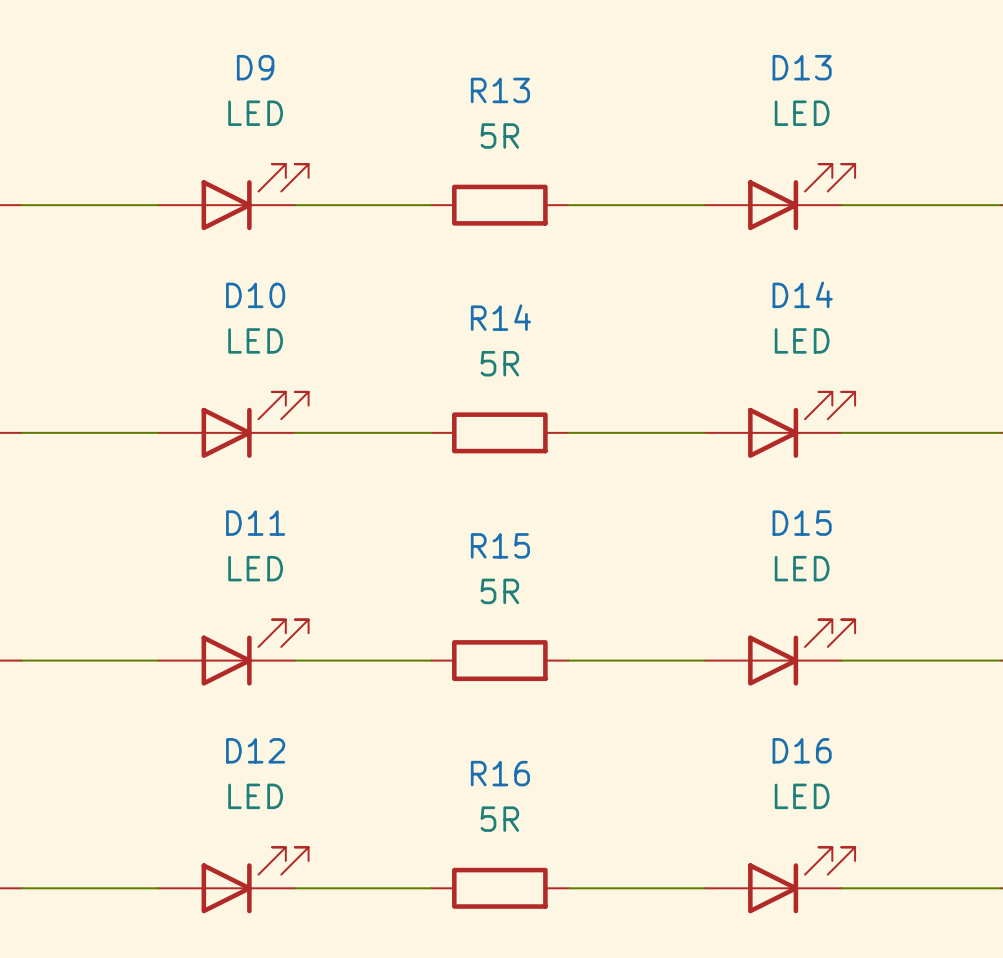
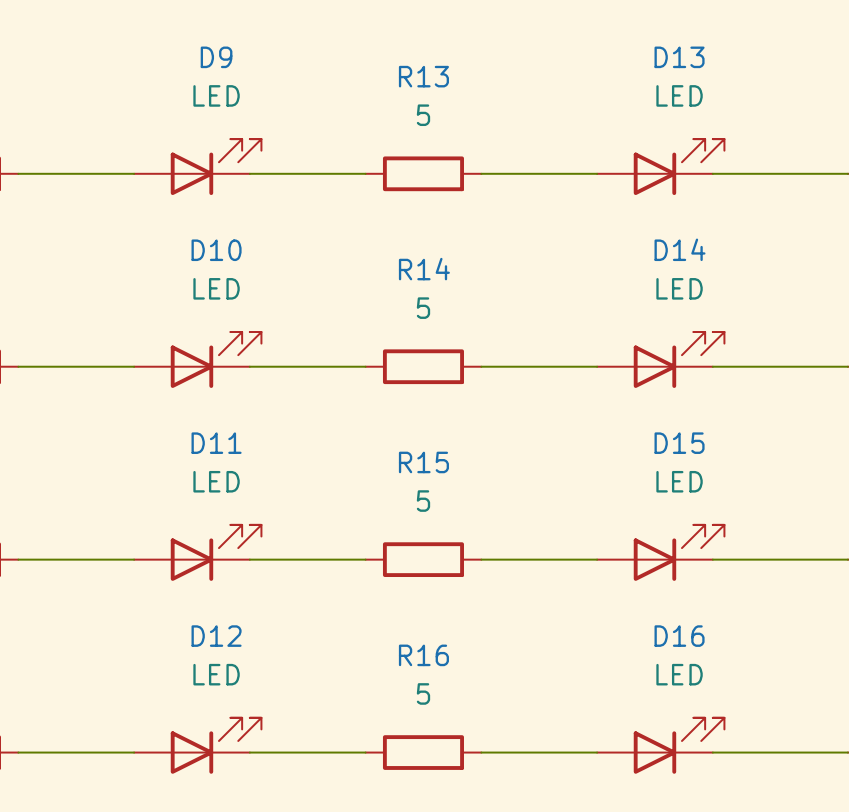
R13 value: 5R (499, 135) -> 5 (423, 115)
R14 value: 5R (499, 363) -> 5 (423, 308)
R15 value: 5R (499, 591) -> 5 (423, 501)
R16 value: 5R (499, 819) -> 5 (423, 693)

